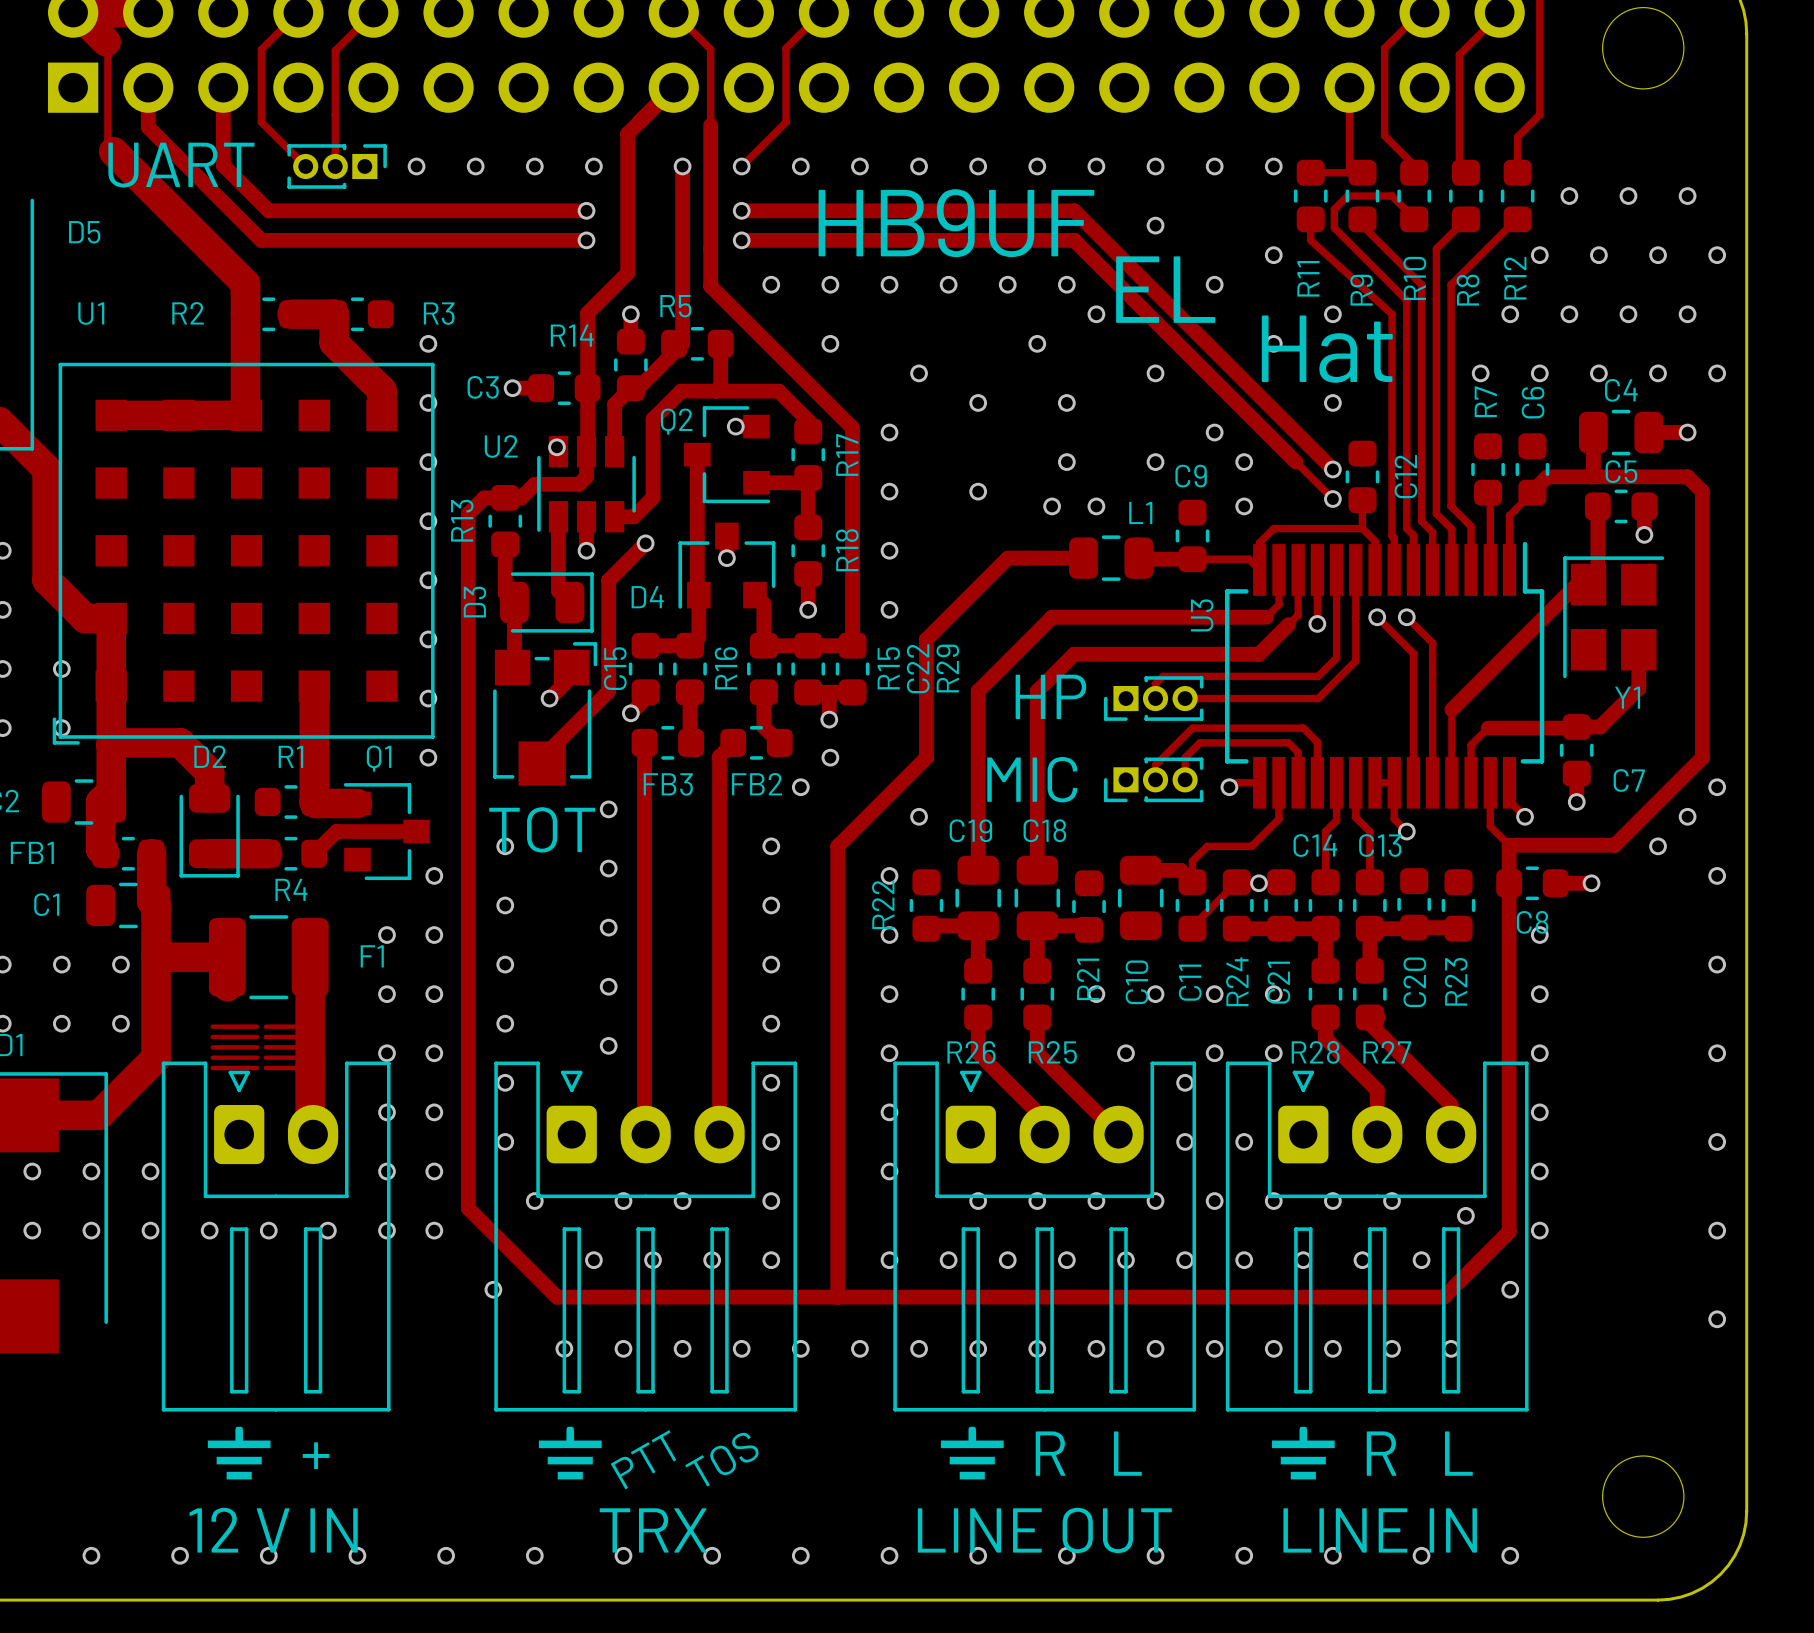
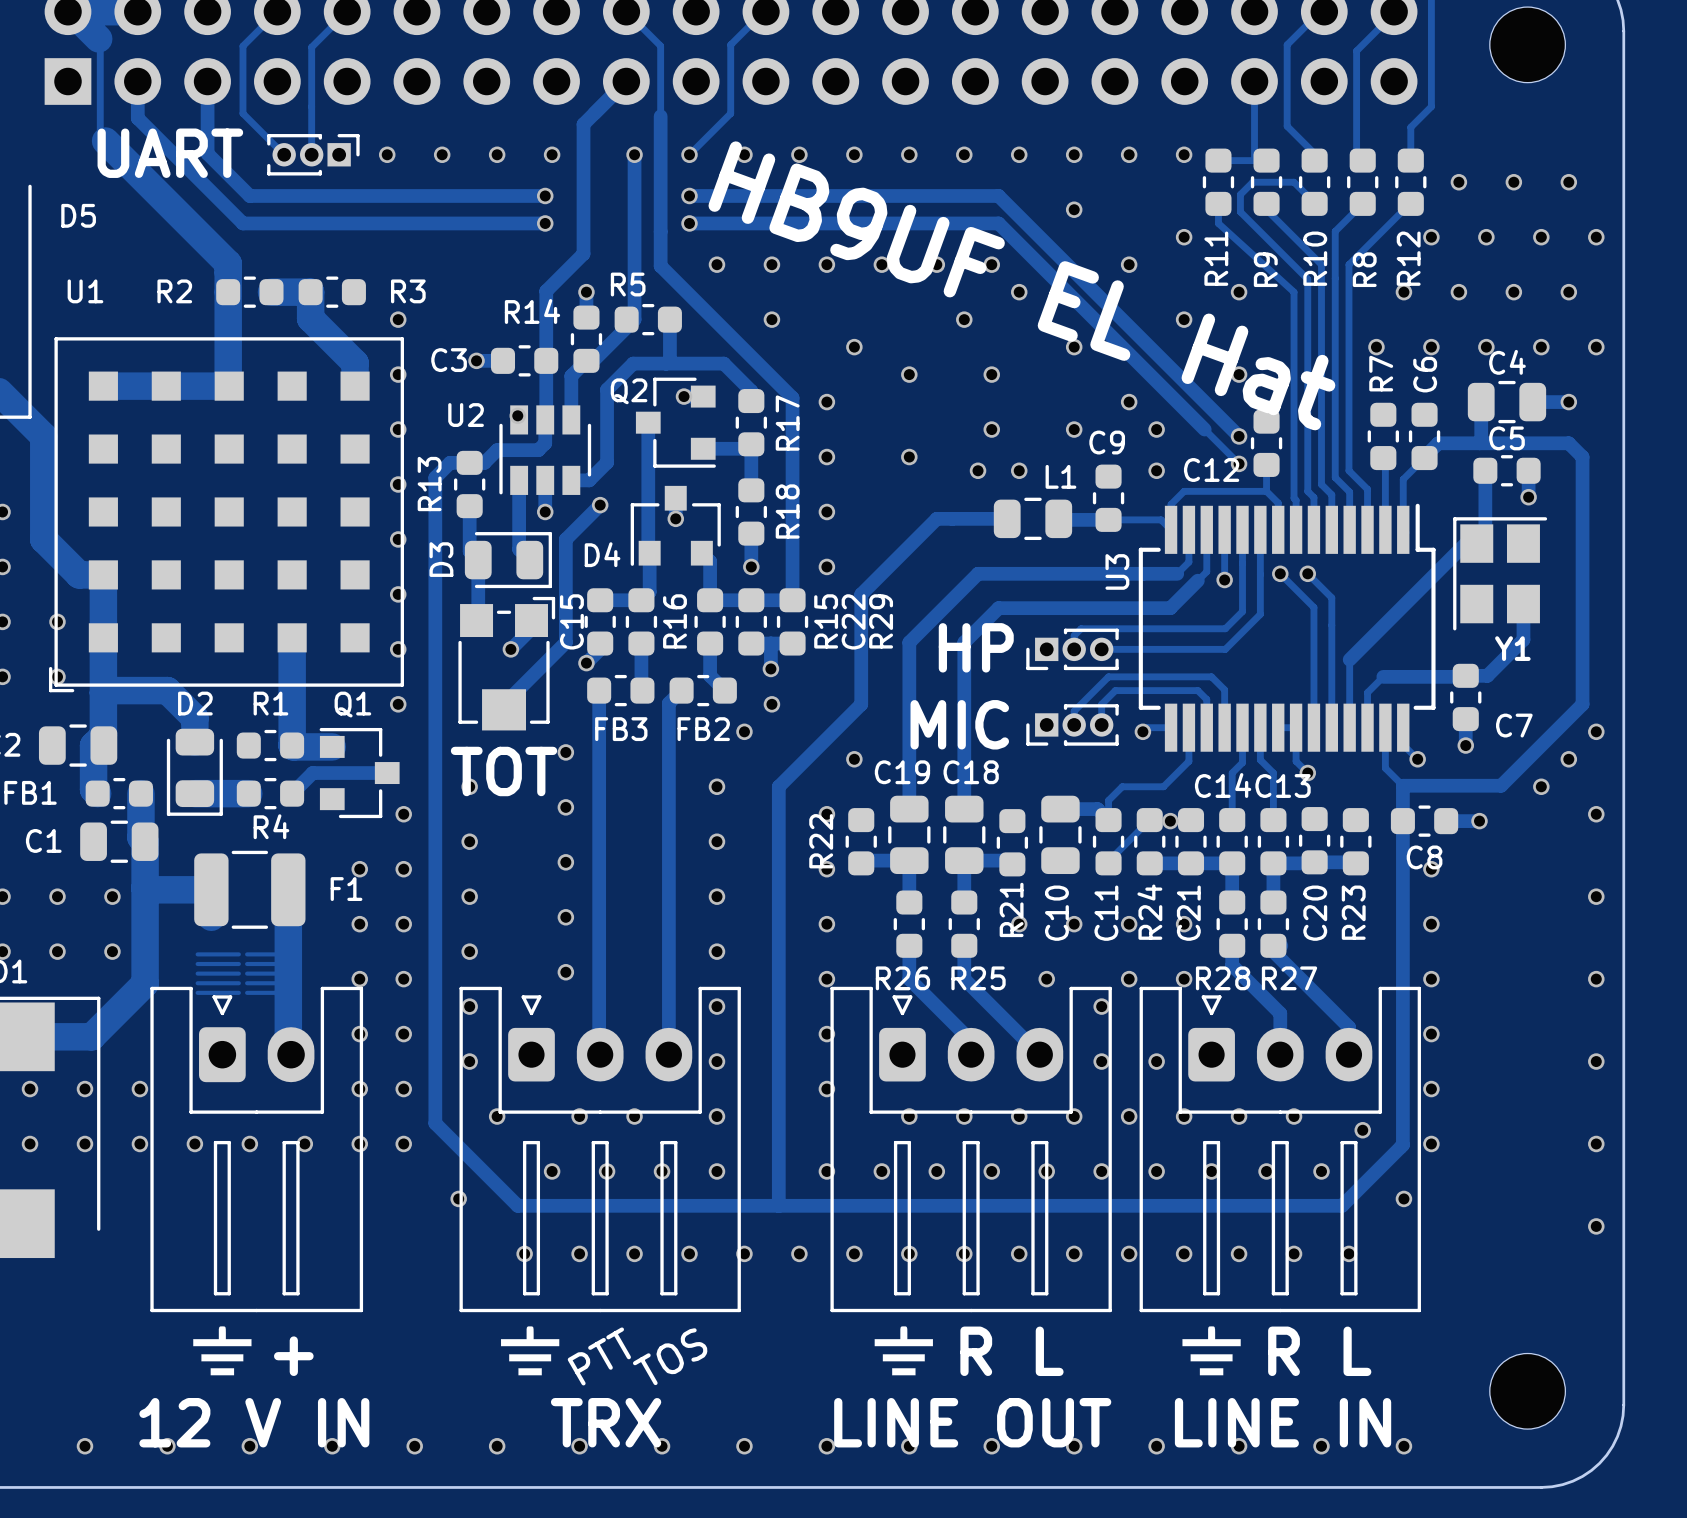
text: HB9UF (956, 223) -> none
text: EL (1165, 289) -> none
text: none -> HB9UF EL Hat (1021, 285)
text: Hat (1327, 349) -> none
C12 name rotation: 0° (1405, 476) -> 90° clockwise (1211, 470)
C12 name position: C12 (1405, 476) -> C12 (1211, 470)

